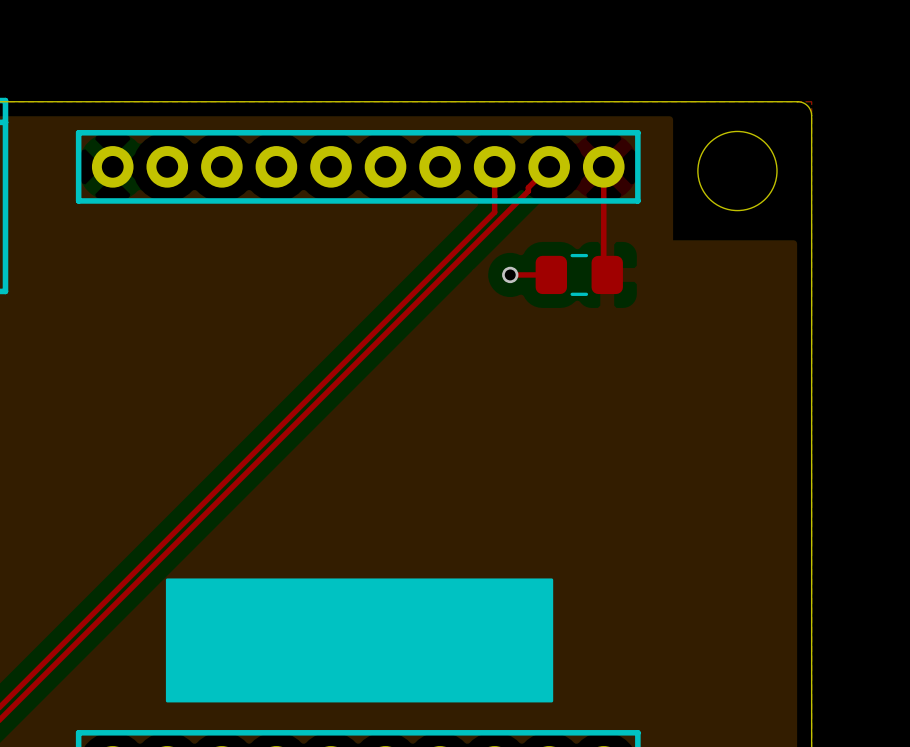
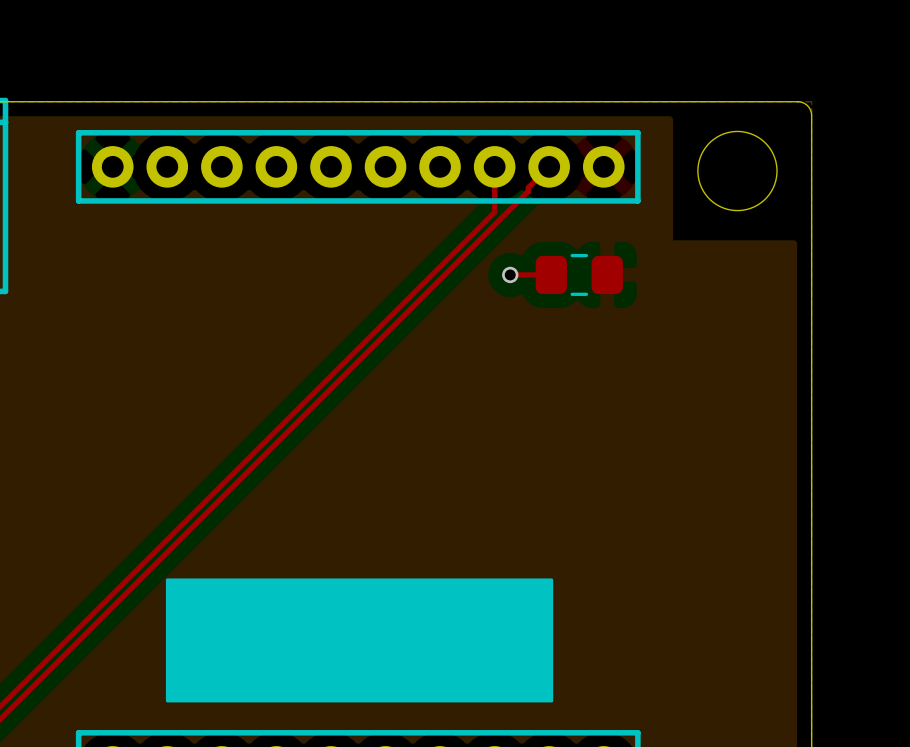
top track: (603, 166) (603, 271) -> none

